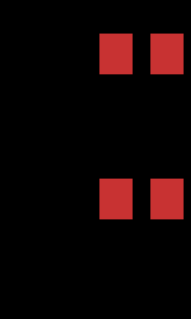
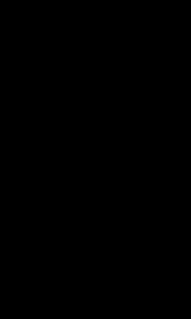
part: (141, 53) -> none
part: (141, 199) -> none

